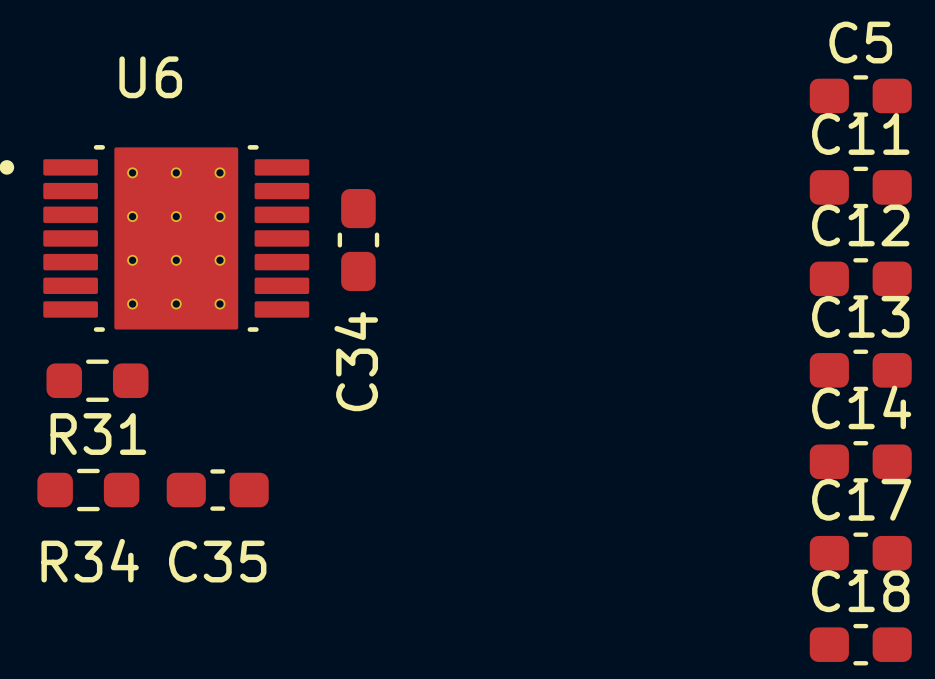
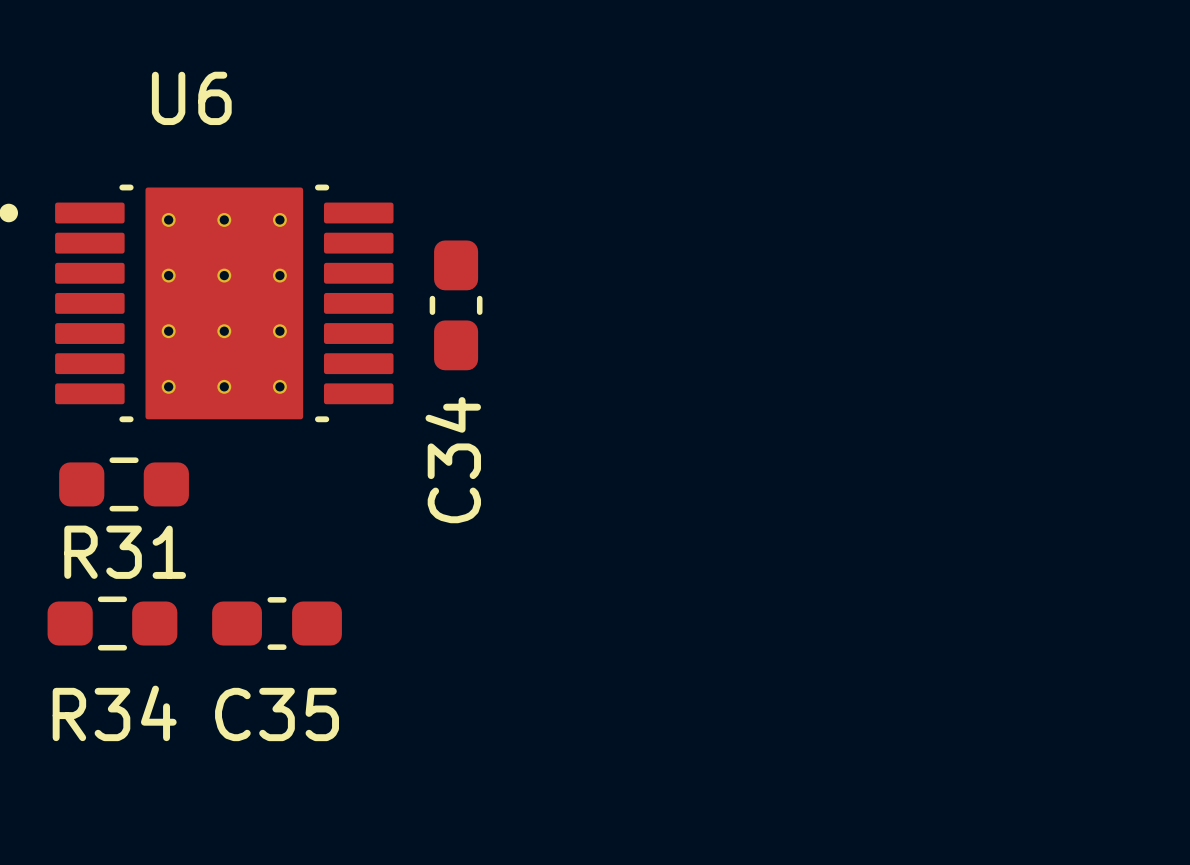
C5: (860, 95) -> none
C11: (860, 187) -> none
C12: (860, 278) -> none
C13: (860, 370) -> none
C14: (860, 461) -> none
C17: (860, 553) -> none
C18: (860, 644) -> none

